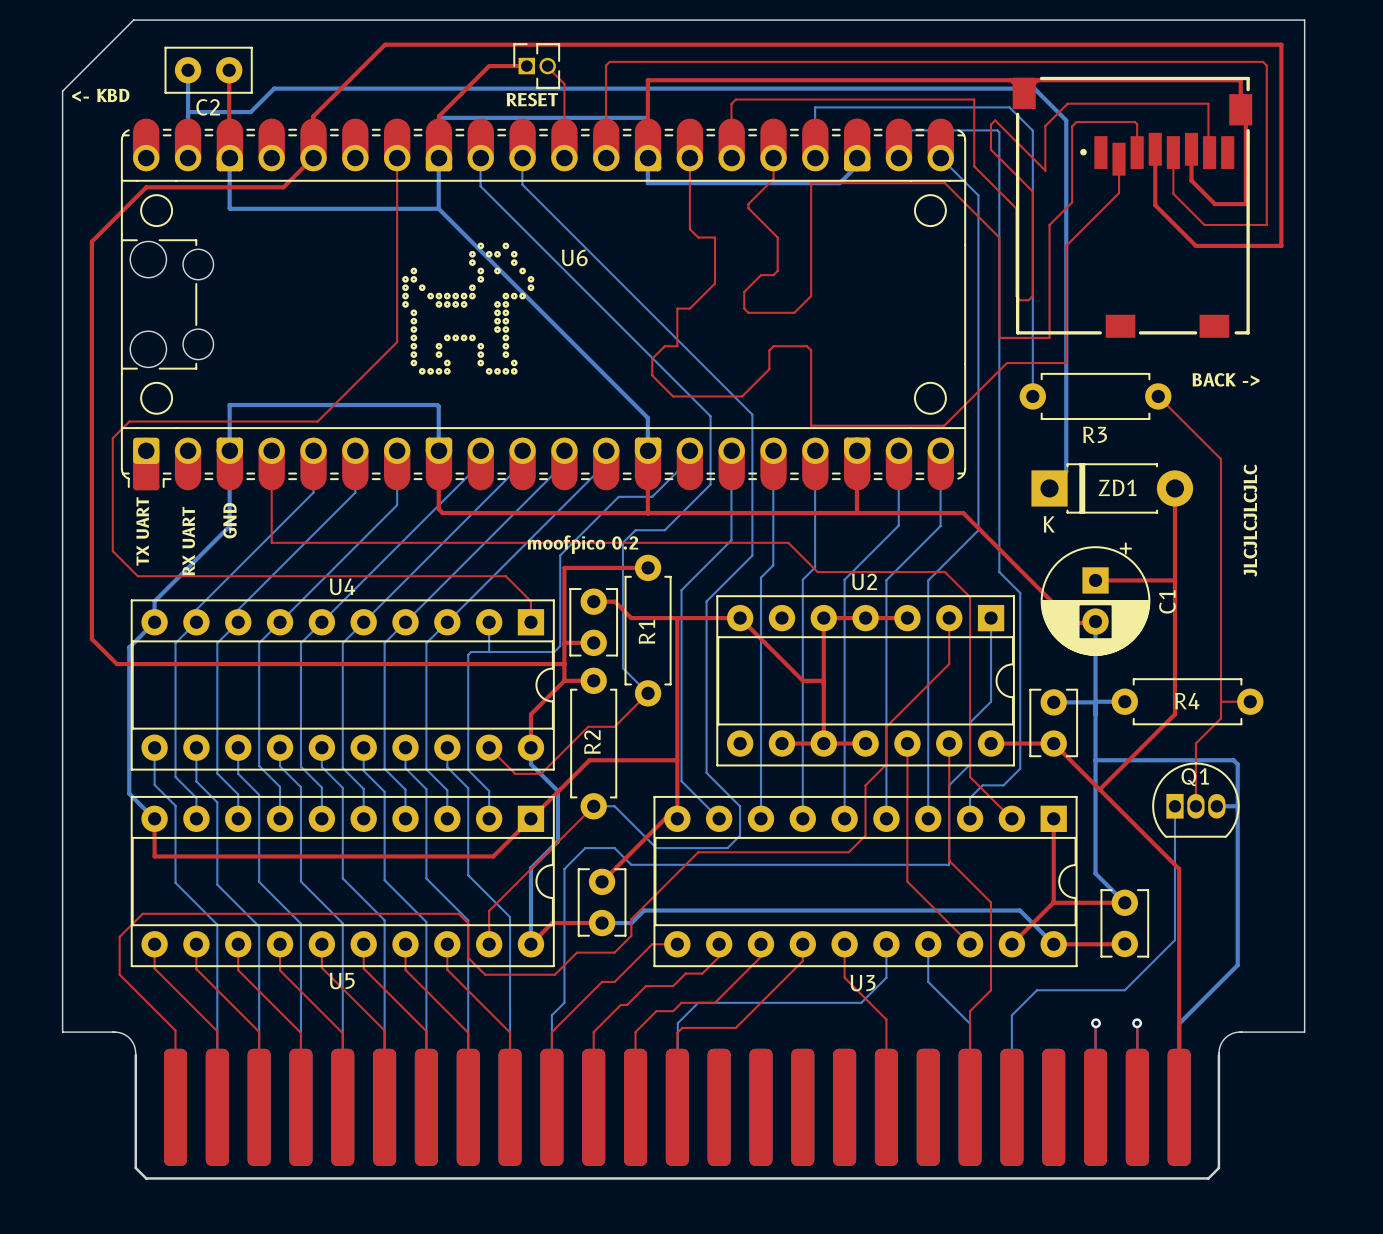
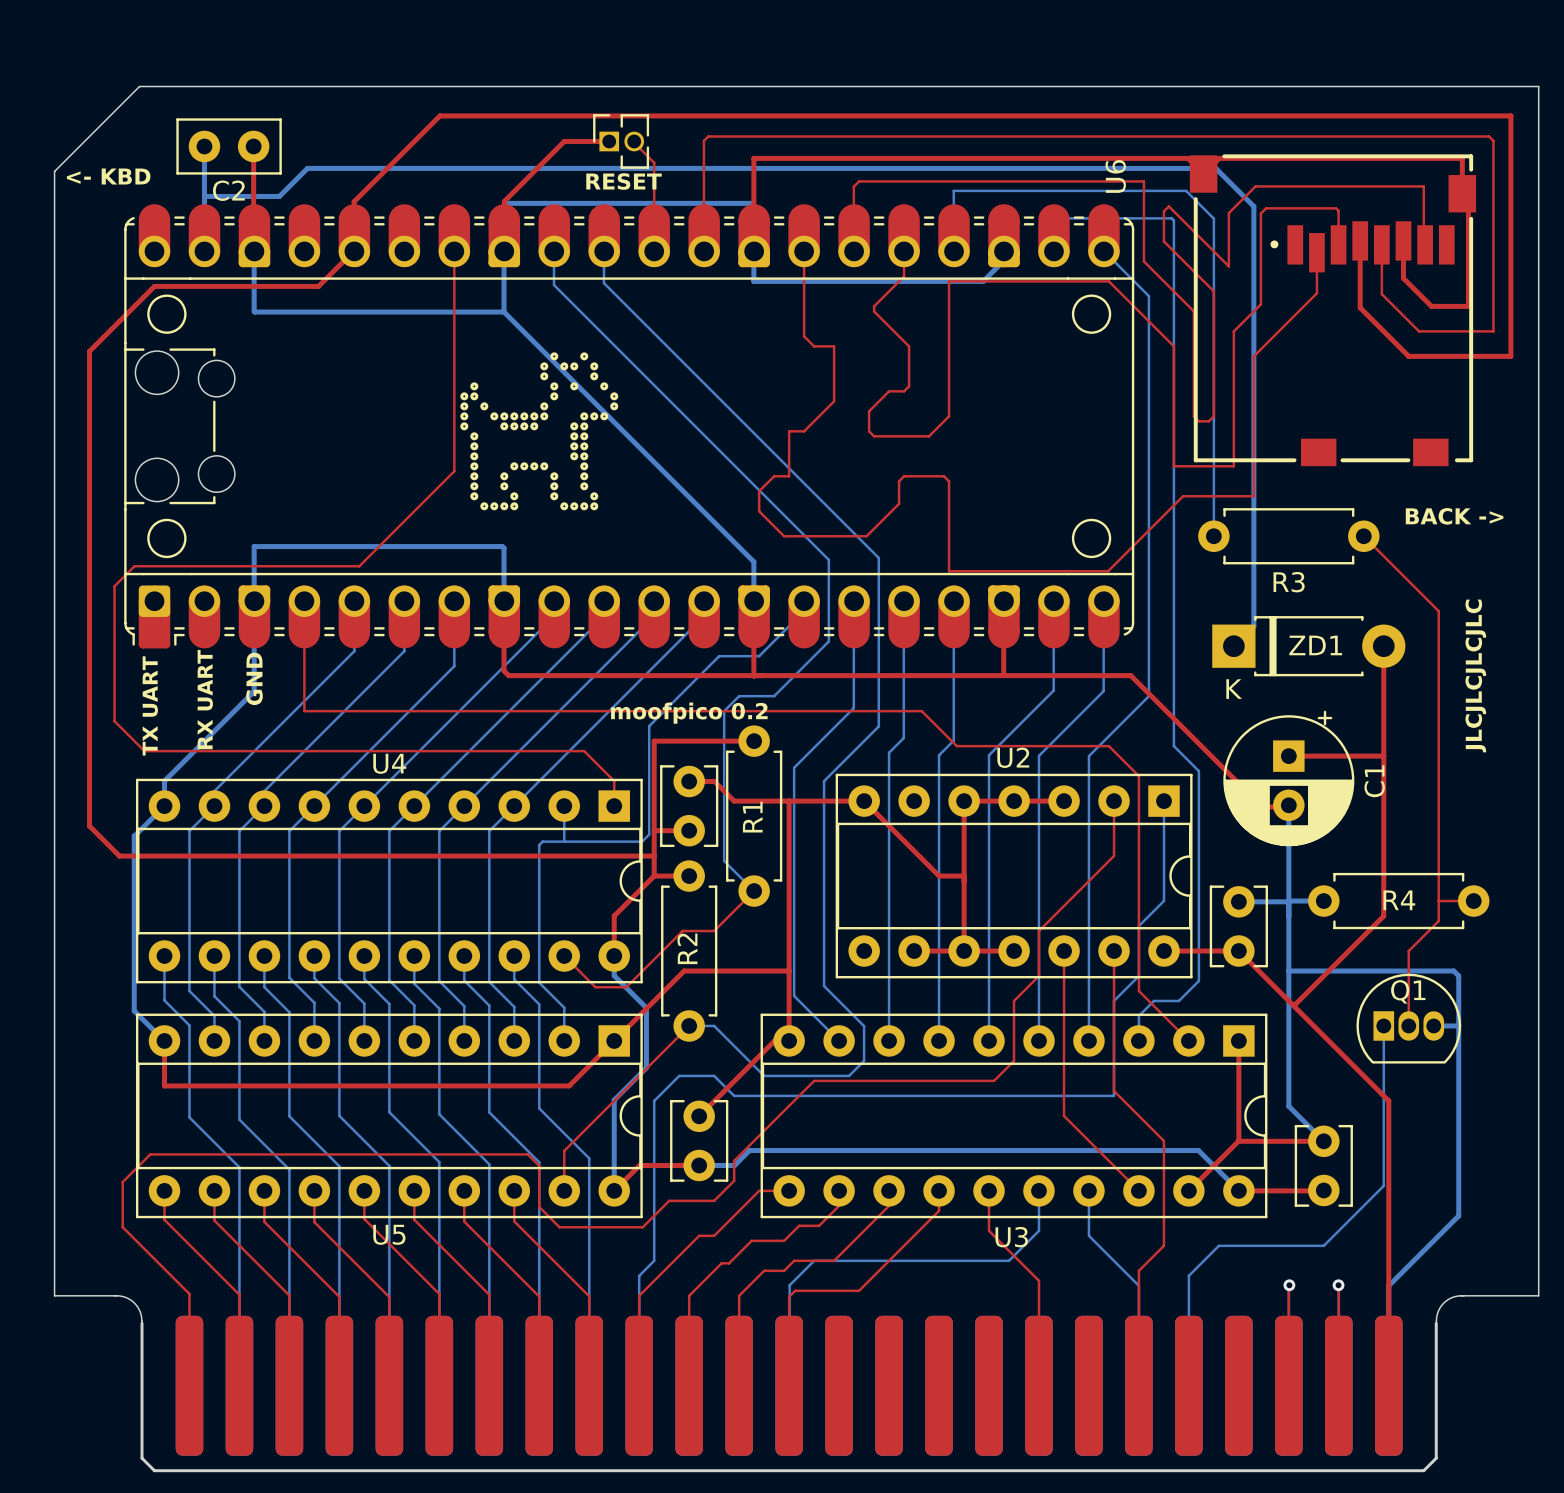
U6 name rotation: 0° (574, 257) -> 90° counterclockwise (1115, 176)
U6 name position: U6 (574, 257) -> U6 (1115, 176)

